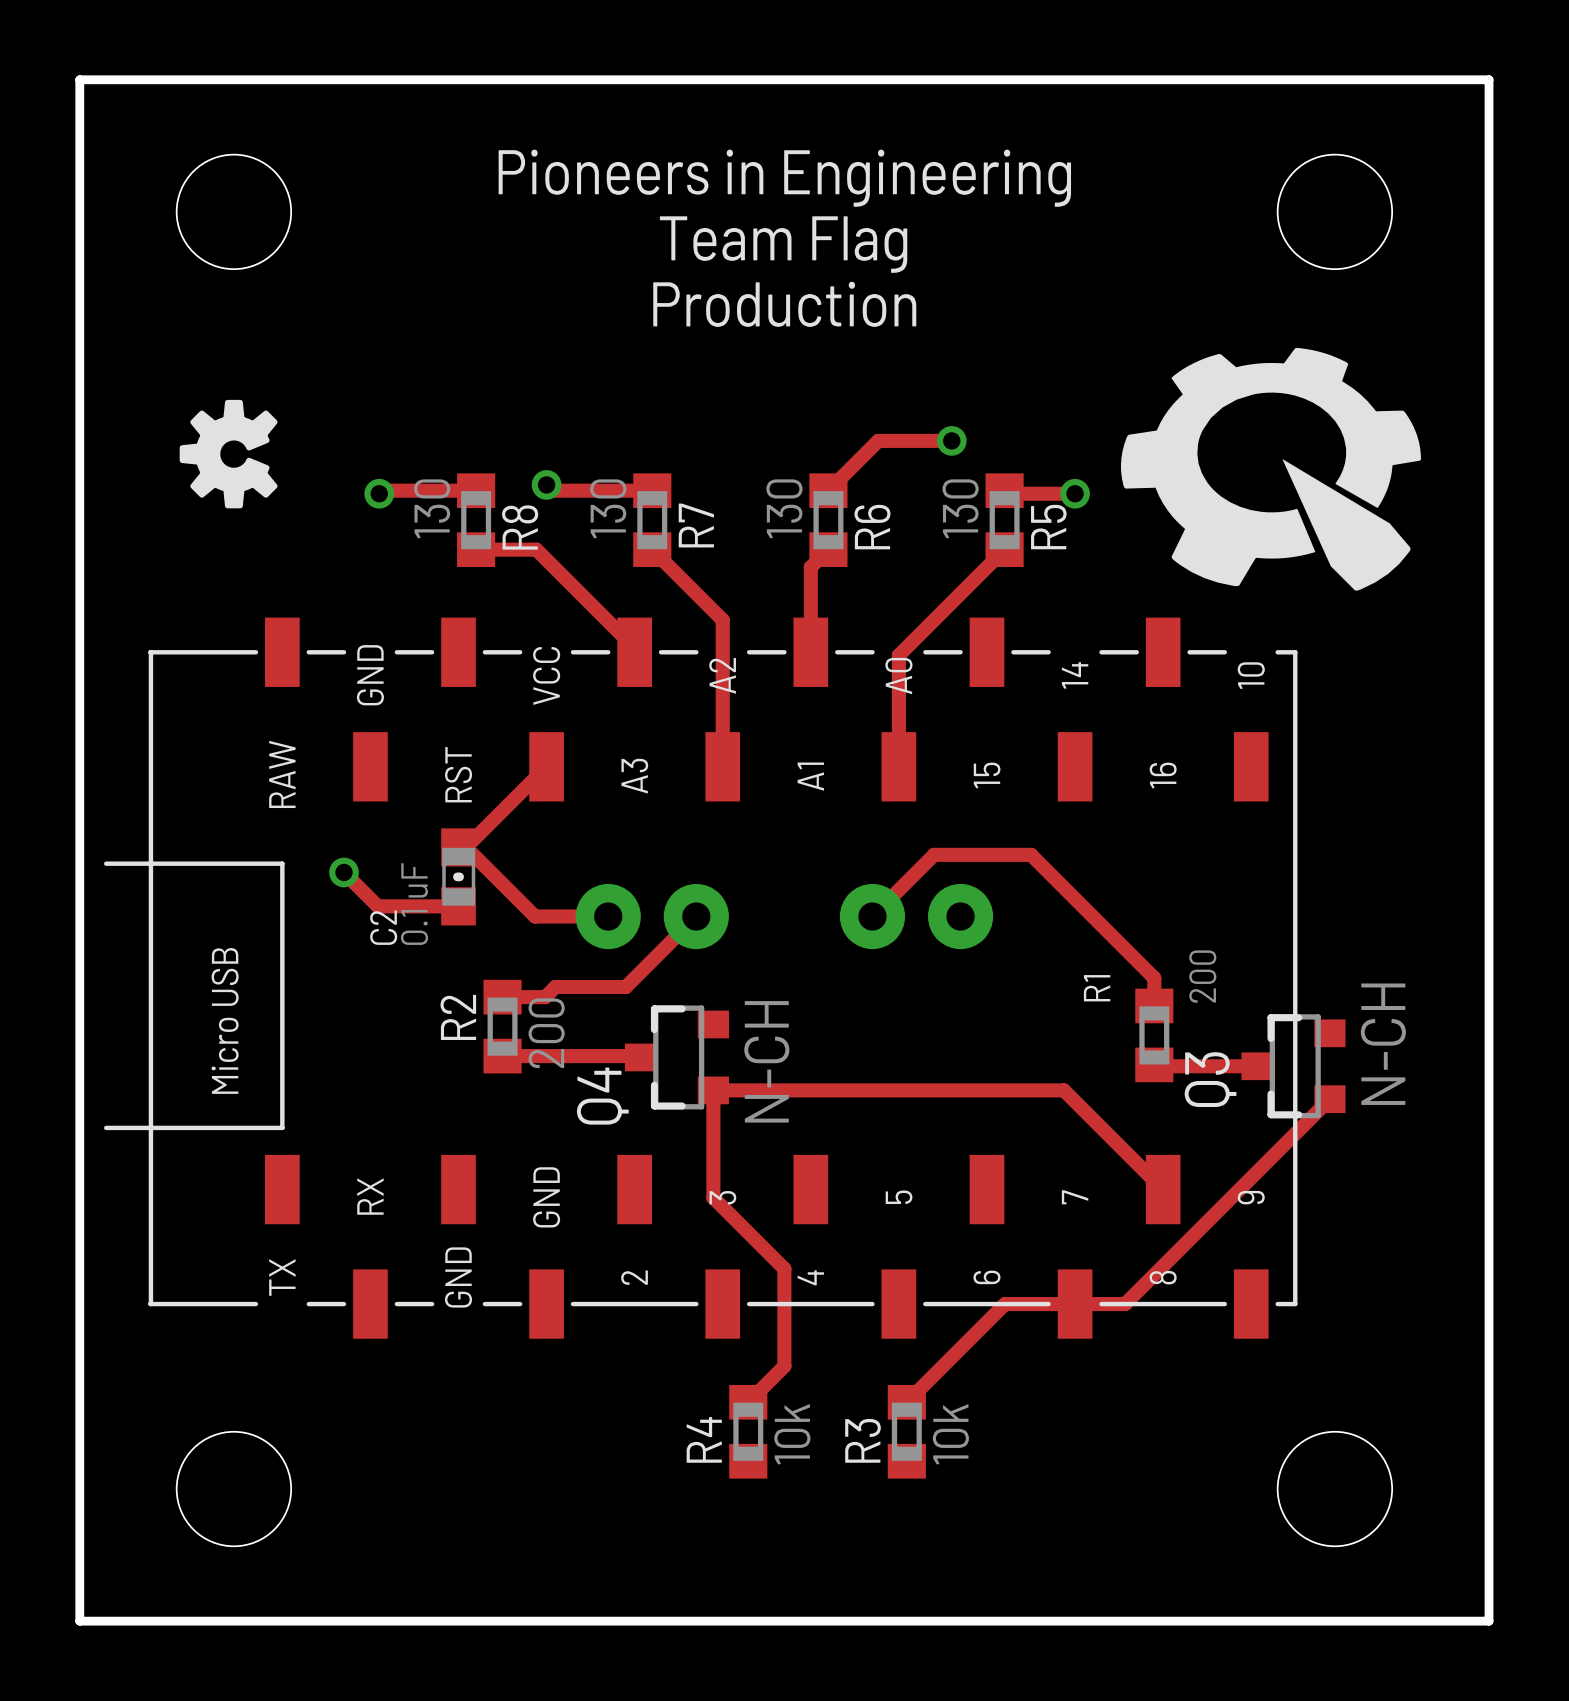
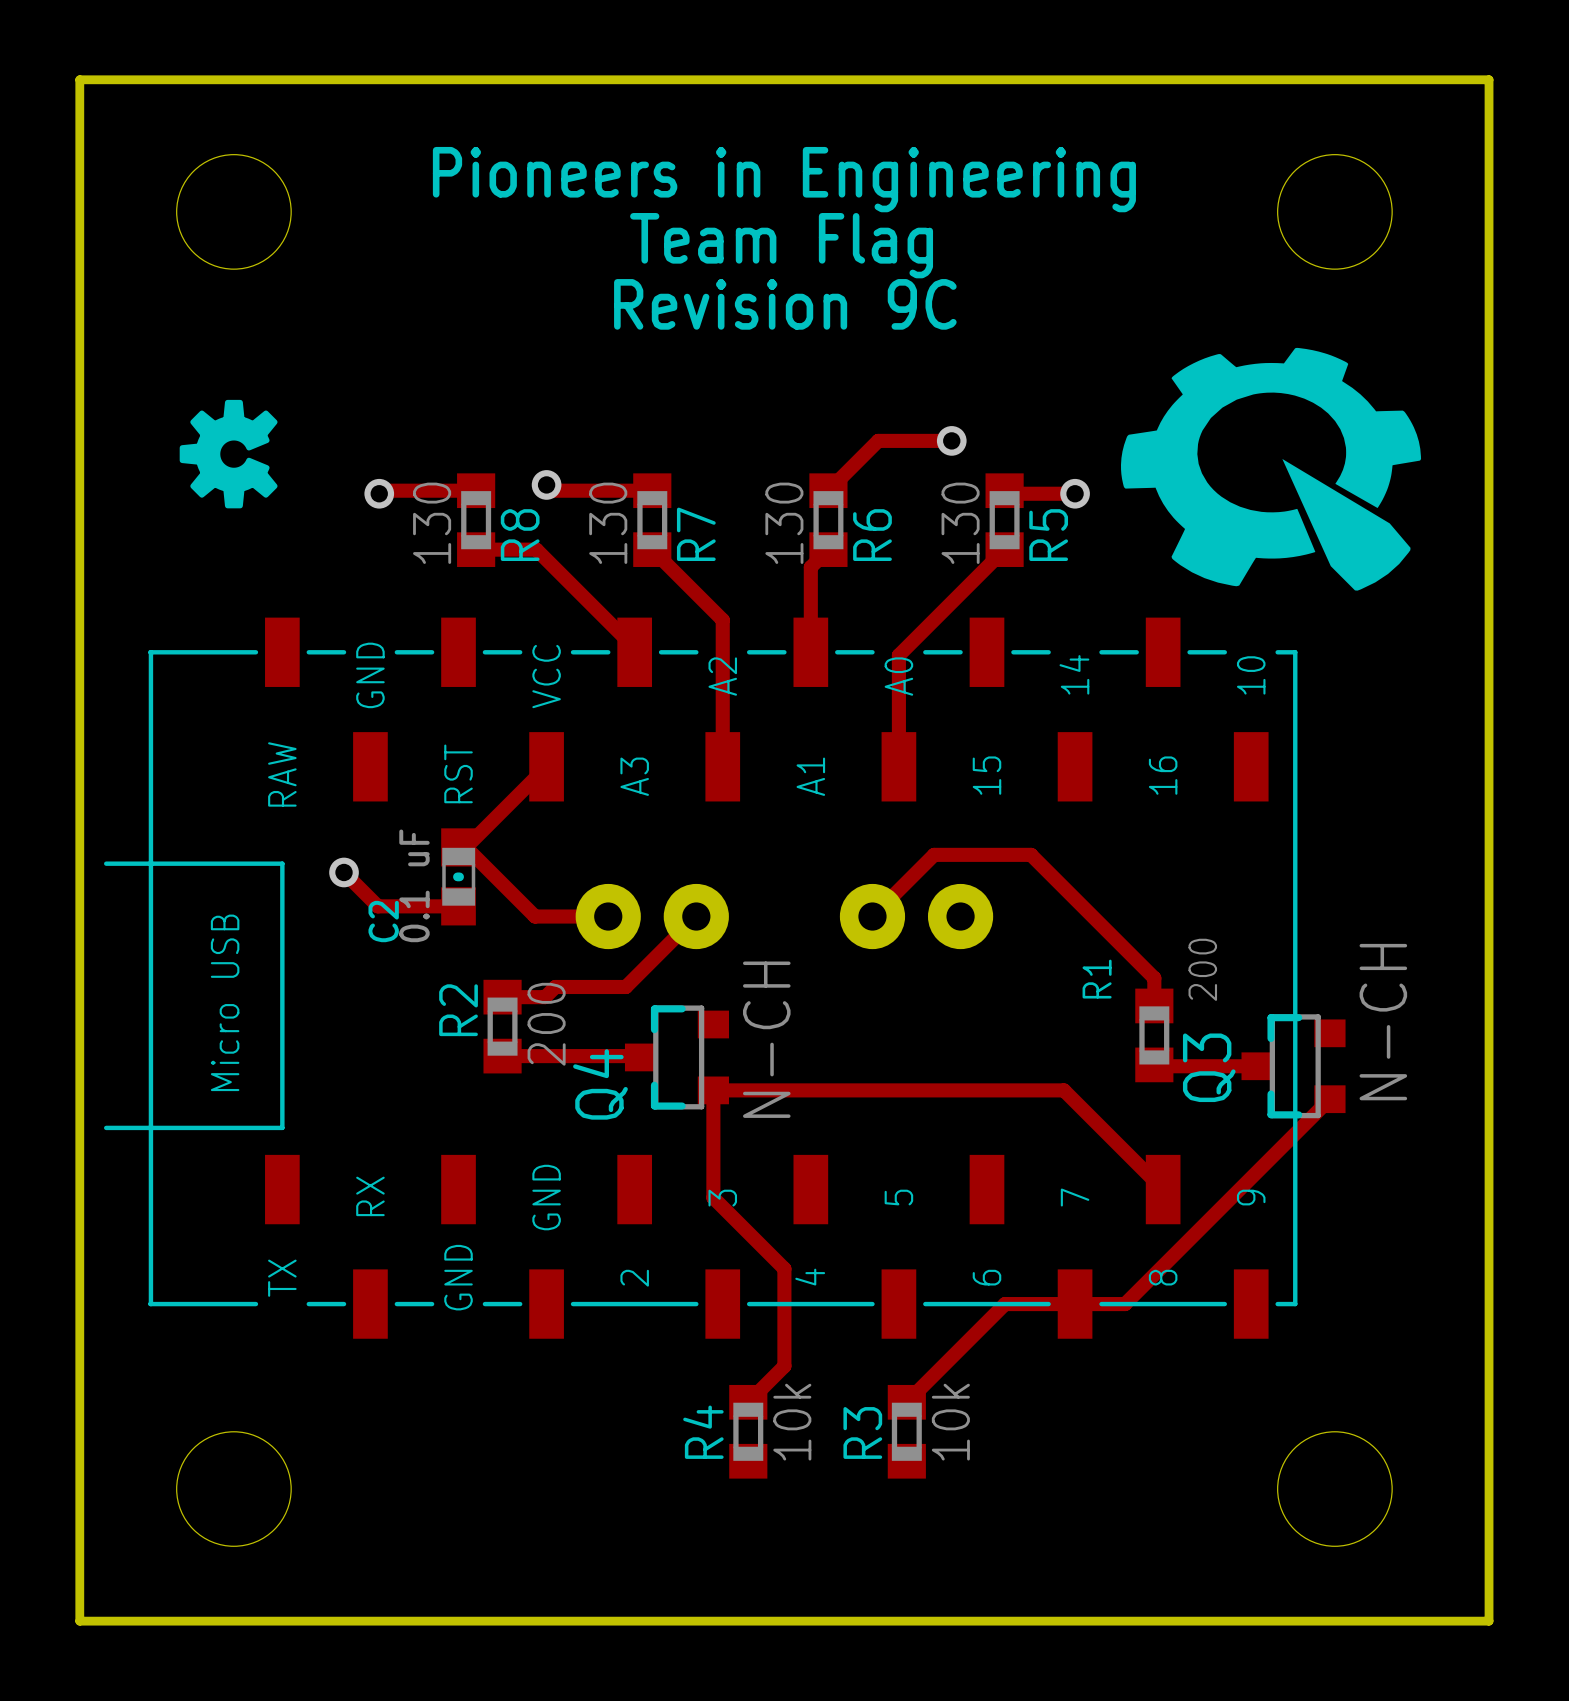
text: Production (784, 304) -> Revision 9C (785, 304)

